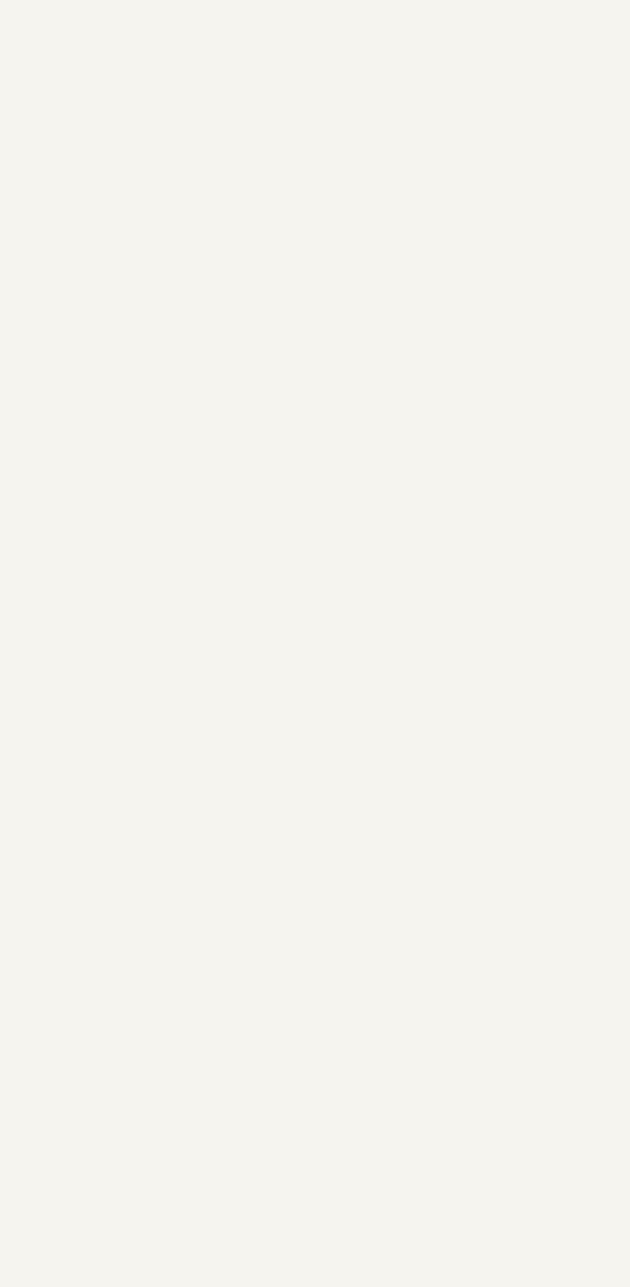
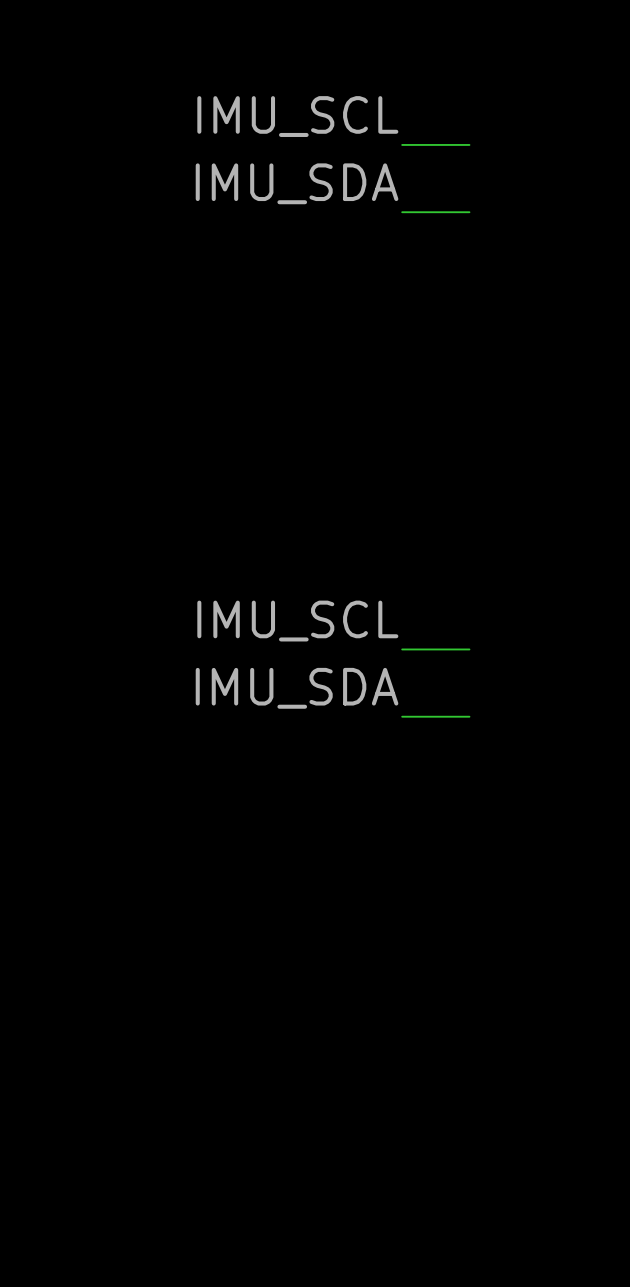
label: none -> IMU_SCL (297, 116)
wire: none -> (402, 144) (469, 144)
label: none -> IMU_SDA (297, 183)
wire: none -> (402, 212) (469, 212)
label: none -> IMU_SCL (297, 621)
wire: none -> (402, 649) (469, 649)
label: none -> IMU_SDA (297, 688)
wire: none -> (402, 716) (469, 716)

